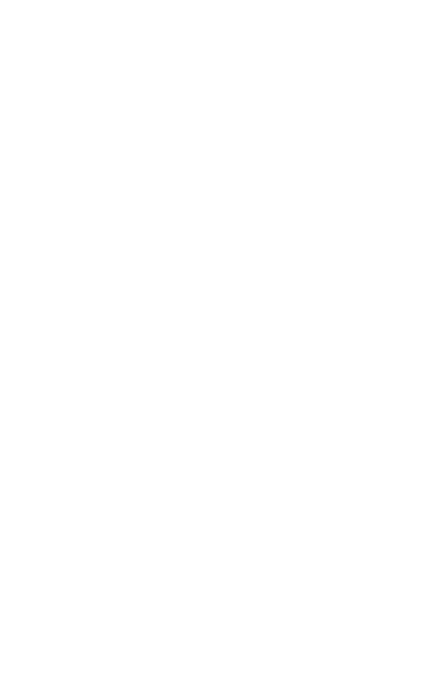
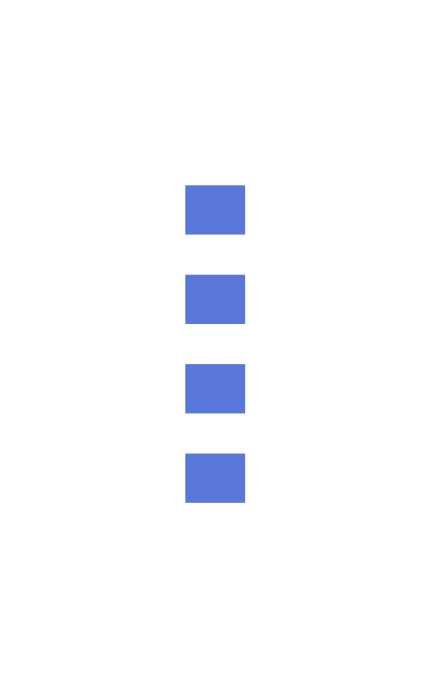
part: none -> (215, 344)

